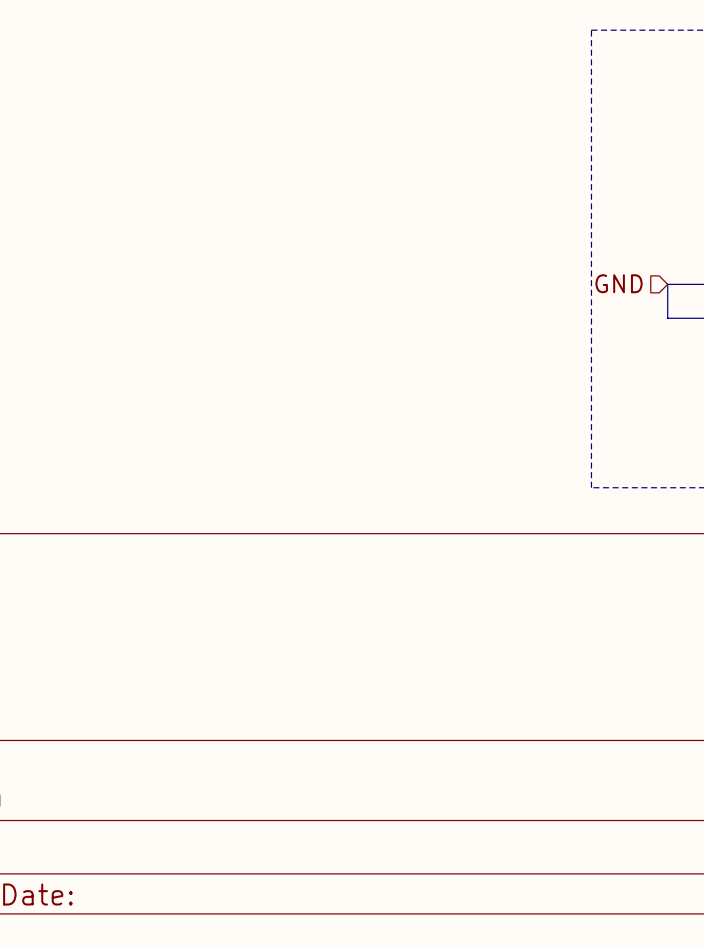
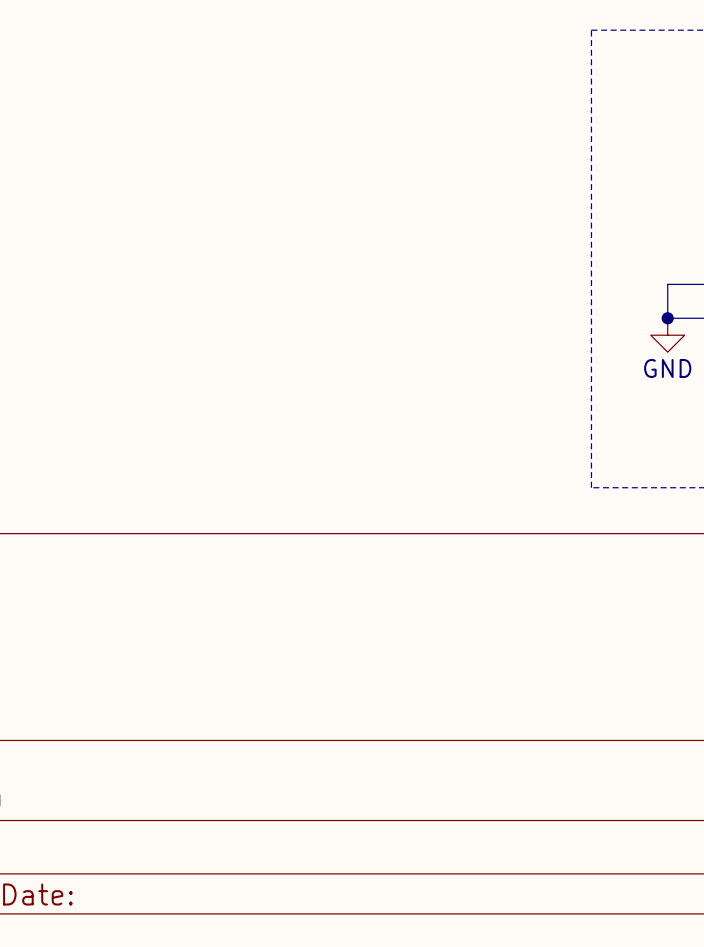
hierarchical label: GND (619, 283) -> none
junction: none -> (667, 318)
power symbol: none -> GND (667, 335)

